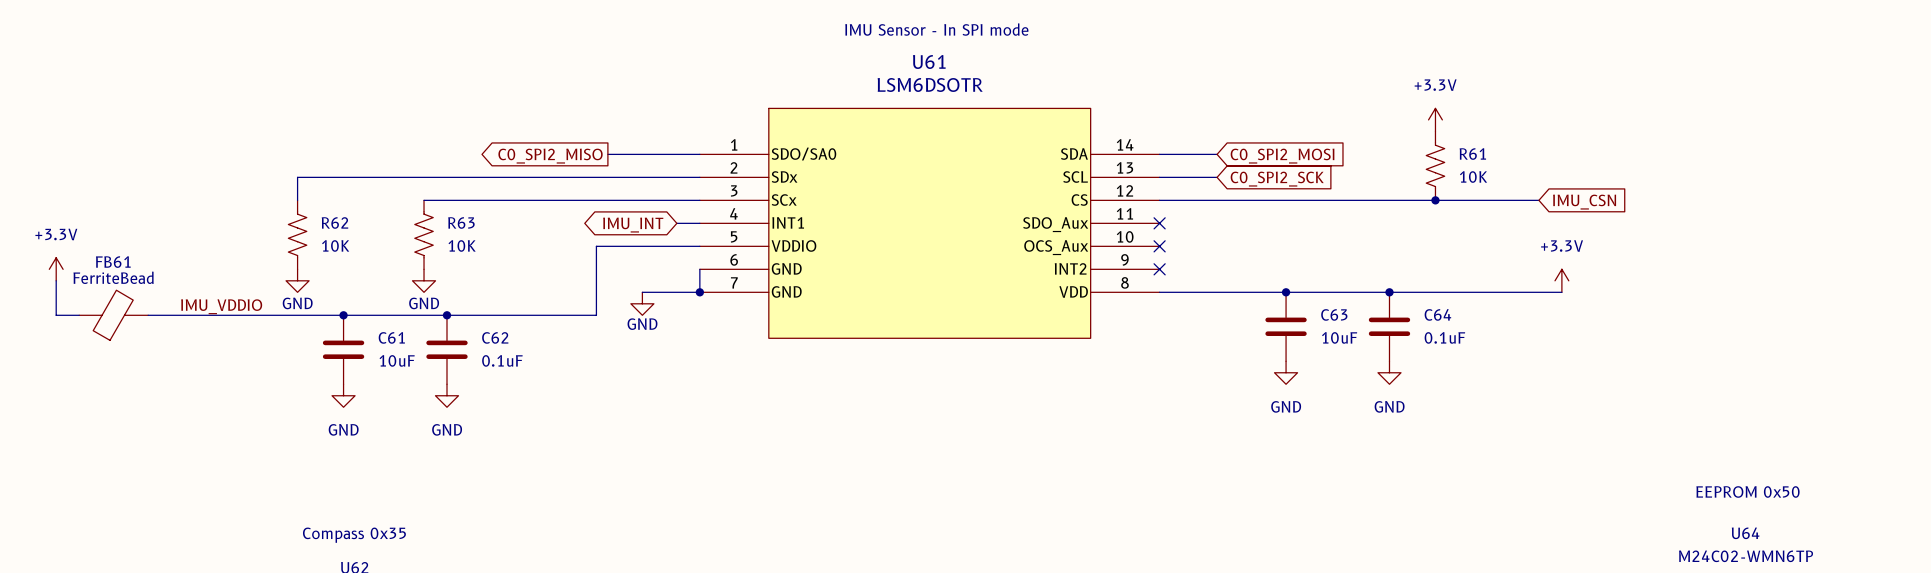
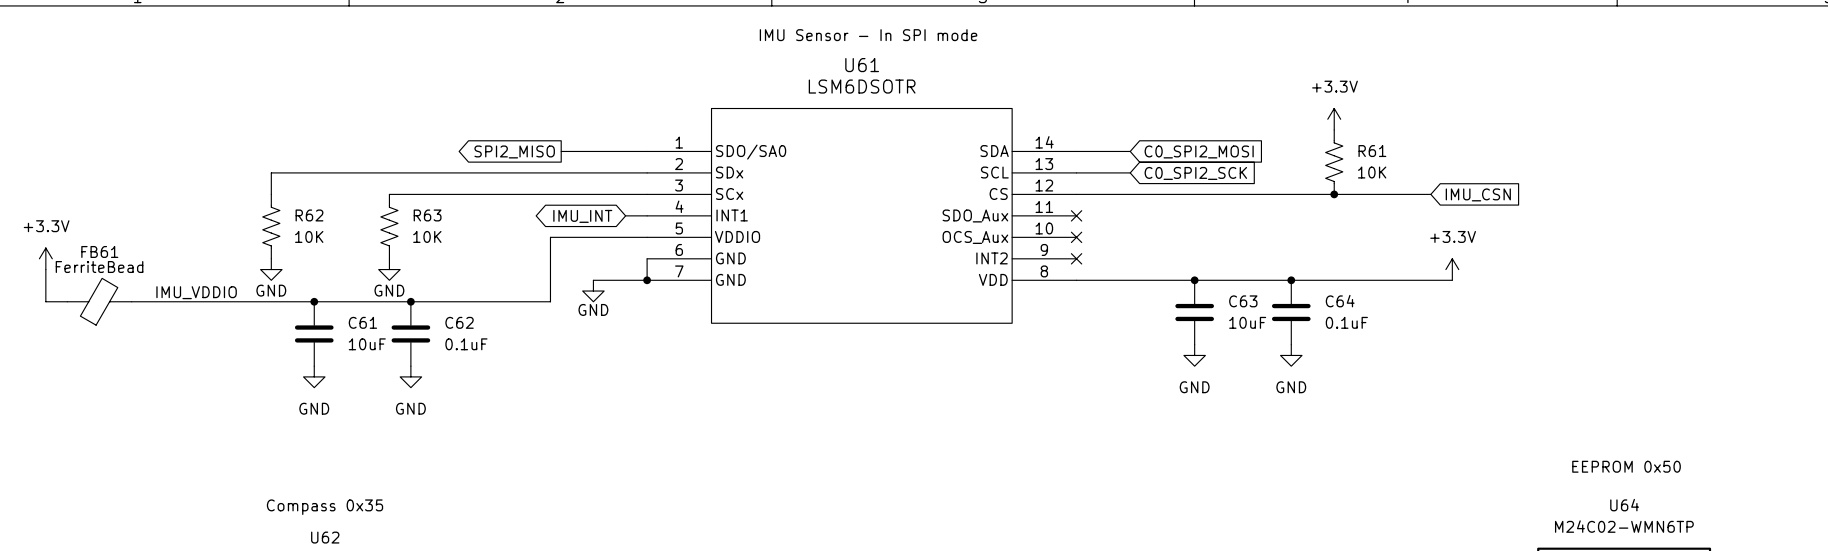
global label: C0_SPI2_MISO (550, 156) -> SPI2_MISO (514, 151)

